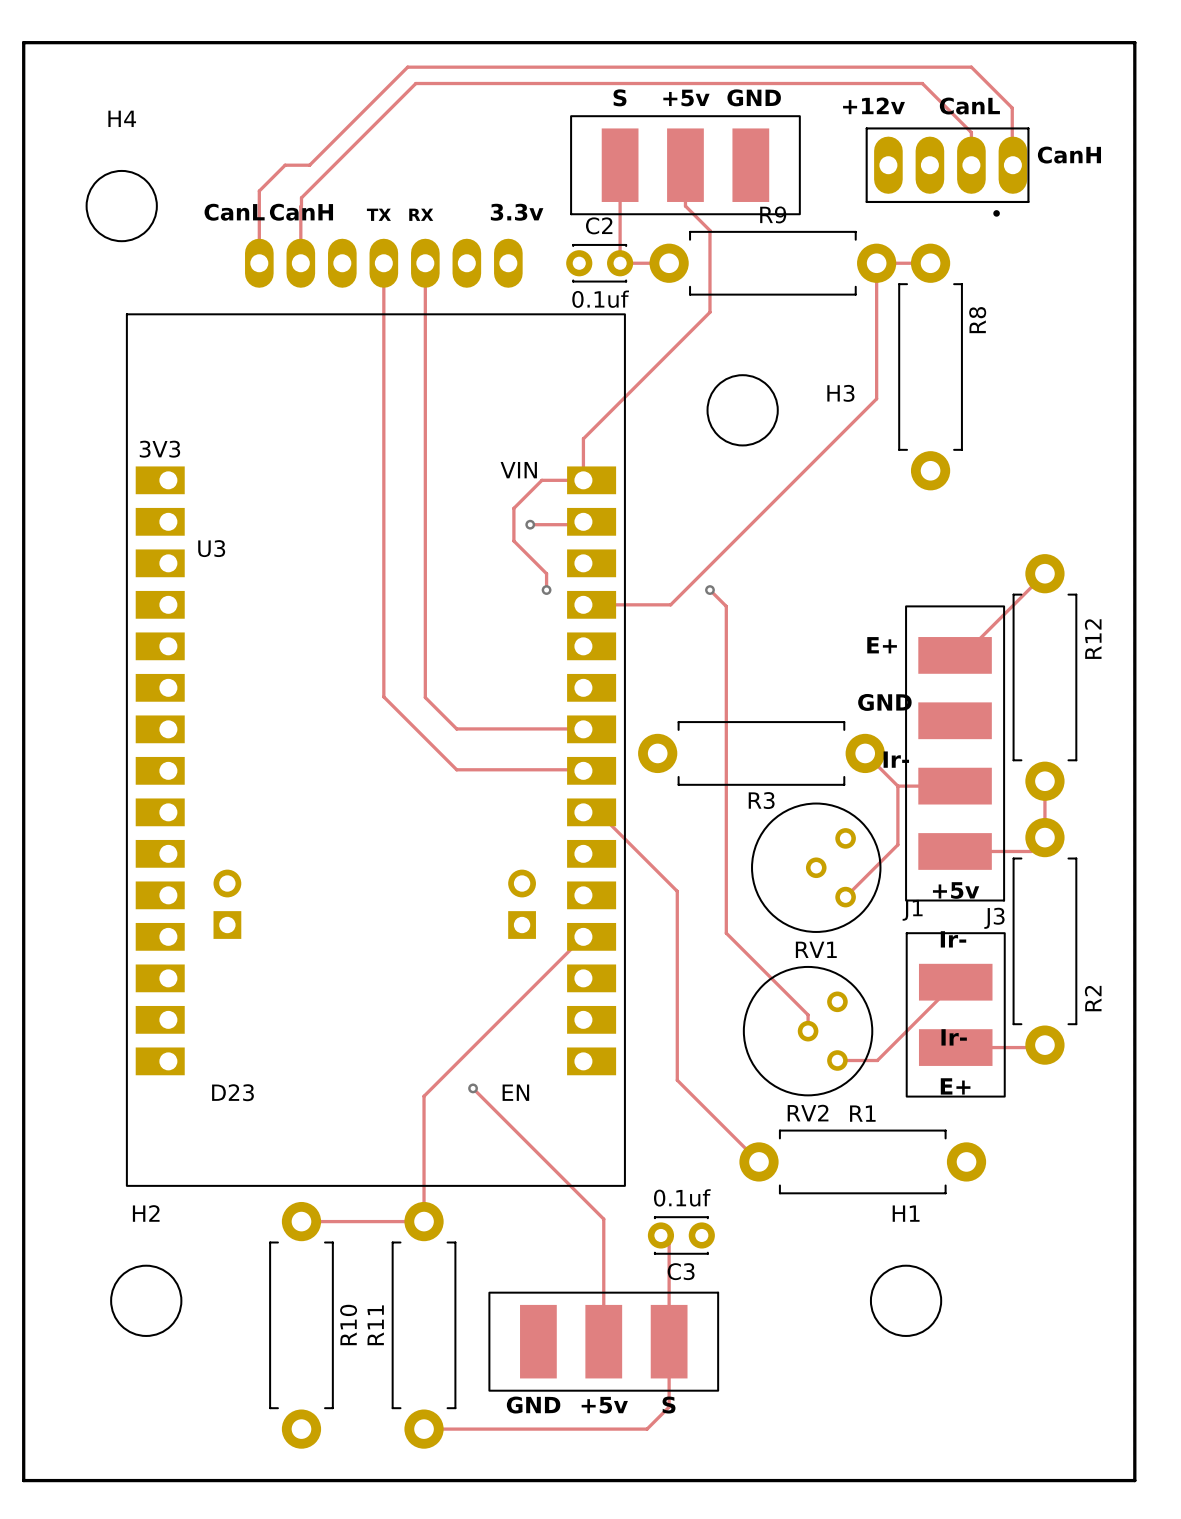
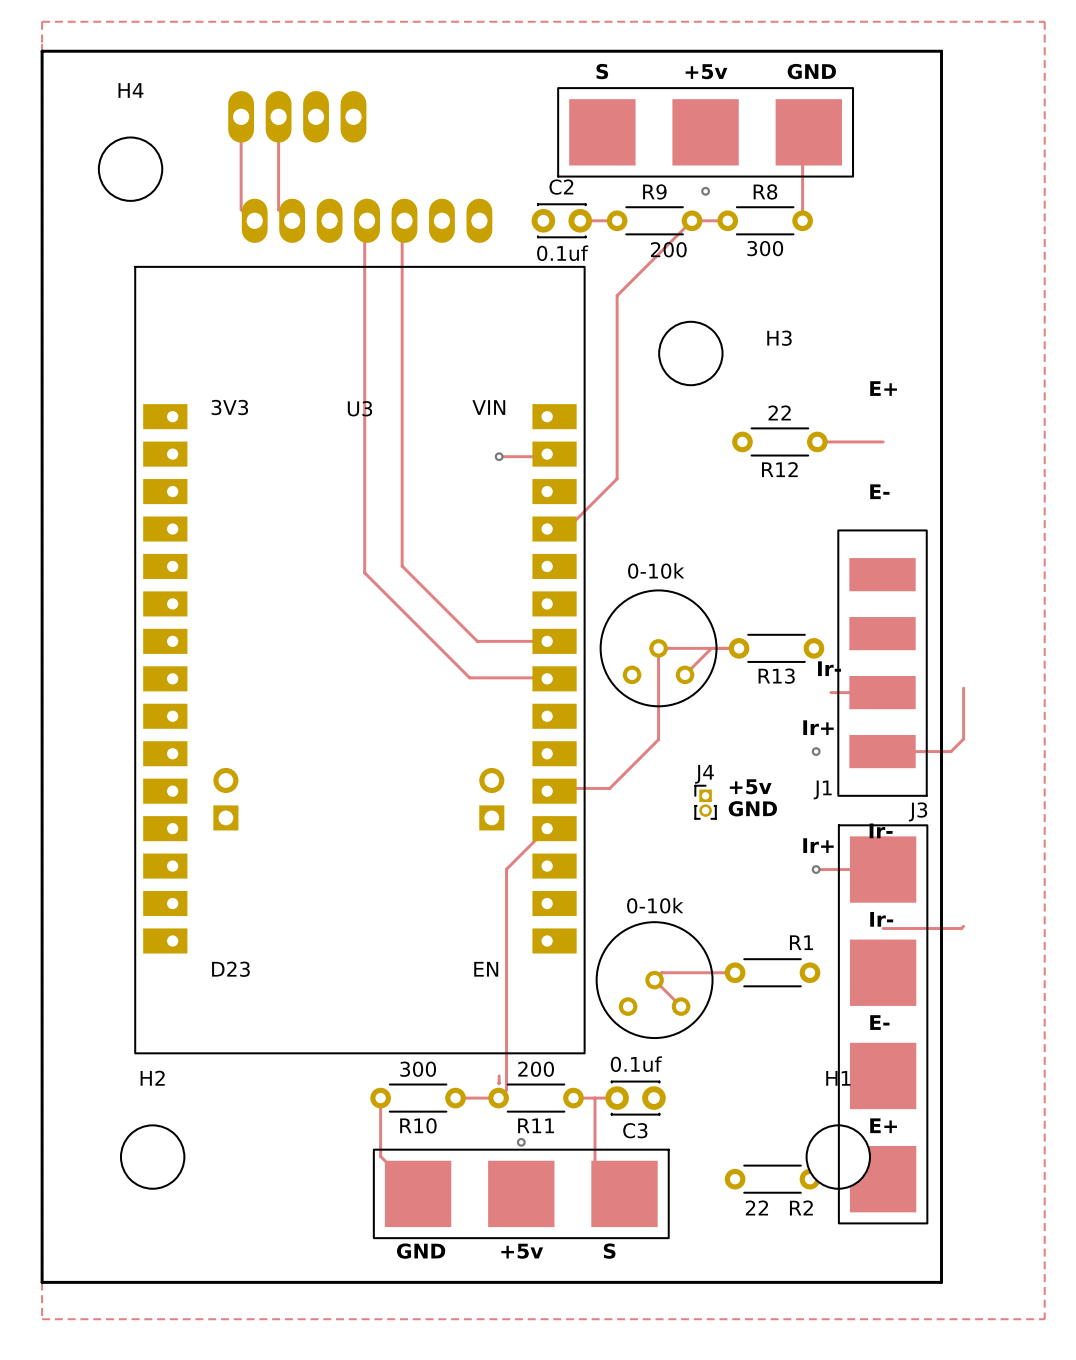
board edge: (23, 75) (23, 42) (1134, 42) (1134, 1480) (23, 1480) (23, 1439) -> (42, 51) (941, 51) (941, 1282) (42, 1282)
text position: S (619, 97) -> S (602, 71)
text position: GND (754, 97) -> GND (811, 71)
text position: +5v (686, 98) -> +5v (706, 71)
text: +12v (874, 105) -> none
text: CanL (969, 106) -> none
track: none -> (241, 116) (241, 209) (252, 220)
track: none -> (278, 116) (278, 209) (289, 220)
part: none -> (297, 116)
text: CanH (1069, 155) -> none
track: (620, 165) (620, 263) -> none
track: (685, 165) (685, 206) (709, 230) (709, 312) (583, 438) (583, 480) (541, 480) (513, 508) (513, 541) (546, 573) (546, 590) -> none
part: (685, 165) -> none
part: none -> (705, 132)
track: none -> (808, 132) (802, 138) (802, 220)
track: (971, 165) (971, 132) (922, 83) (415, 83) (301, 197) (300, 263) -> none
track: (1012, 165) (1012, 108) (971, 67) (407, 67) (309, 165) (285, 165) (259, 191) (259, 263) -> none
part: (947, 172) -> none
text: CanL (234, 212) -> none
text: CanH (301, 212) -> none
text: 3.3v (517, 212) -> none
text: TX (378, 214) -> none
text: RX (421, 214) -> none
R9 footprint: [649, 230, 897, 296] -> [606, 206, 703, 236]
via: none -> (705, 191)
R8 footprint: [898, 243, 963, 491] -> [717, 206, 813, 236]
track: (383, 263) (383, 696) (456, 769) (497, 769) -> none
track: none -> (402, 220) (402, 566) (477, 641) (547, 641)
track: (425, 263) (425, 697) -> (364, 220) (364, 572) (404, 612)
track: (930, 263) (876, 263) (876, 398) (670, 604) (605, 604) -> (727, 220) (692, 220) (617, 295) (617, 478) (566, 529)
R8 value: none -> 300 (765, 248)
R9 value: none -> 200 (668, 249)
U3 footprint: [126, 313, 626, 1187] -> [134, 266, 586, 1055]
R8 name position: R8 (977, 320) -> R8 (765, 191)
R12 value: none -> 22 (779, 412)
track: none -> (817, 441) (883, 441)
U3 name position: U3 (211, 548) -> U3 (359, 408)
R12 footprint: [1012, 554, 1078, 801] -> [732, 427, 828, 457]
text: none -> E- (879, 491)
track: (1044, 573) (963, 655) (955, 655) -> none
via: (546, 590) -> none
track: (709, 590) (726, 606) (726, 933) (808, 1014) (808, 1031) -> none
via: (709, 590) -> none
R12 name position: R12 (1093, 639) -> R12 (779, 469)
text position: E+ (882, 645) -> E+ (883, 388)
text position: GND (884, 702) -> GND (752, 808)
track: (456, 728) (583, 729) -> (432, 641) (469, 677)
part: none -> 0-10k (658, 648)
track: none -> (711, 648) (685, 674)
track: none -> (739, 648) (658, 648) (658, 739) (609, 788) (549, 788) (547, 791)
R13: none -> (776, 648)
R3: (761, 753) -> none
track: (865, 753) (897, 786) (897, 844) (845, 897) -> none
track: (583, 812) (598, 812) (677, 891) (677, 1080) (758, 1161) -> none
R2 footprint: [1012, 817, 1078, 1065] -> [724, 1164, 821, 1194]
text: none -> Ir+ (818, 727)
via: none -> (816, 751)
RV1: (816, 867) -> none
text position: +5v (956, 890) -> +5v (750, 786)
J4: none -> (705, 802)
J1 name position: J1 (912, 910) -> J1 (822, 789)
J1 footprint: [905, 932, 1006, 1098] -> [838, 824, 929, 1225]
text: none -> Ir+ (818, 845)
track: (538, 981) (424, 1096) (424, 1221) (301, 1221) -> (506, 869) (506, 1090) (498, 1098) (455, 1098)
via: none -> (816, 869)
track: (955, 982) (877, 1060) (837, 1060) -> (883, 869) (816, 869)
RV2: (808, 1031) -> none
text position: E+ (955, 1086) -> E+ (883, 1125)
track: (473, 1088) (603, 1219) (603, 1341) -> none
via: (473, 1088) -> none
track: none -> (735, 972) (661, 972) (654, 980) (681, 1006)
part: none -> 0-10k (654, 980)
R1 name position: R1 (862, 1113) -> R1 (801, 942)
R1 footprint: [739, 1129, 987, 1195] -> [724, 958, 821, 988]
text: none -> E- (879, 1022)
R10 footprint: [269, 1201, 334, 1449] -> [370, 1083, 466, 1113]
R11 footprint: [391, 1201, 457, 1449] -> [488, 1083, 584, 1113]
R10 value: none -> 300 (418, 1069)
R11 value: none -> 200 (536, 1069)
track: none -> (499, 1075) (498, 1083)
track: none -> (380, 1098) (380, 1156) (418, 1193)
track: none -> (595, 1098) (595, 1164) (624, 1193)
track: (660, 1235) (669, 1243) (669, 1407) (647, 1429) (424, 1429) -> (617, 1098) (573, 1098)
via: none -> (521, 1142)
R10 name position: R10 (348, 1324) -> R10 (418, 1125)
R11 name position: R11 (375, 1325) -> R11 (536, 1125)
part: none -> (521, 1193)
part: (603, 1341) -> none
R2 value: none -> 22 (756, 1207)
text position: GND (533, 1405) -> GND (421, 1251)
text position: +5v (604, 1405) -> +5v (522, 1251)
text position: S (669, 1405) -> S (609, 1251)

